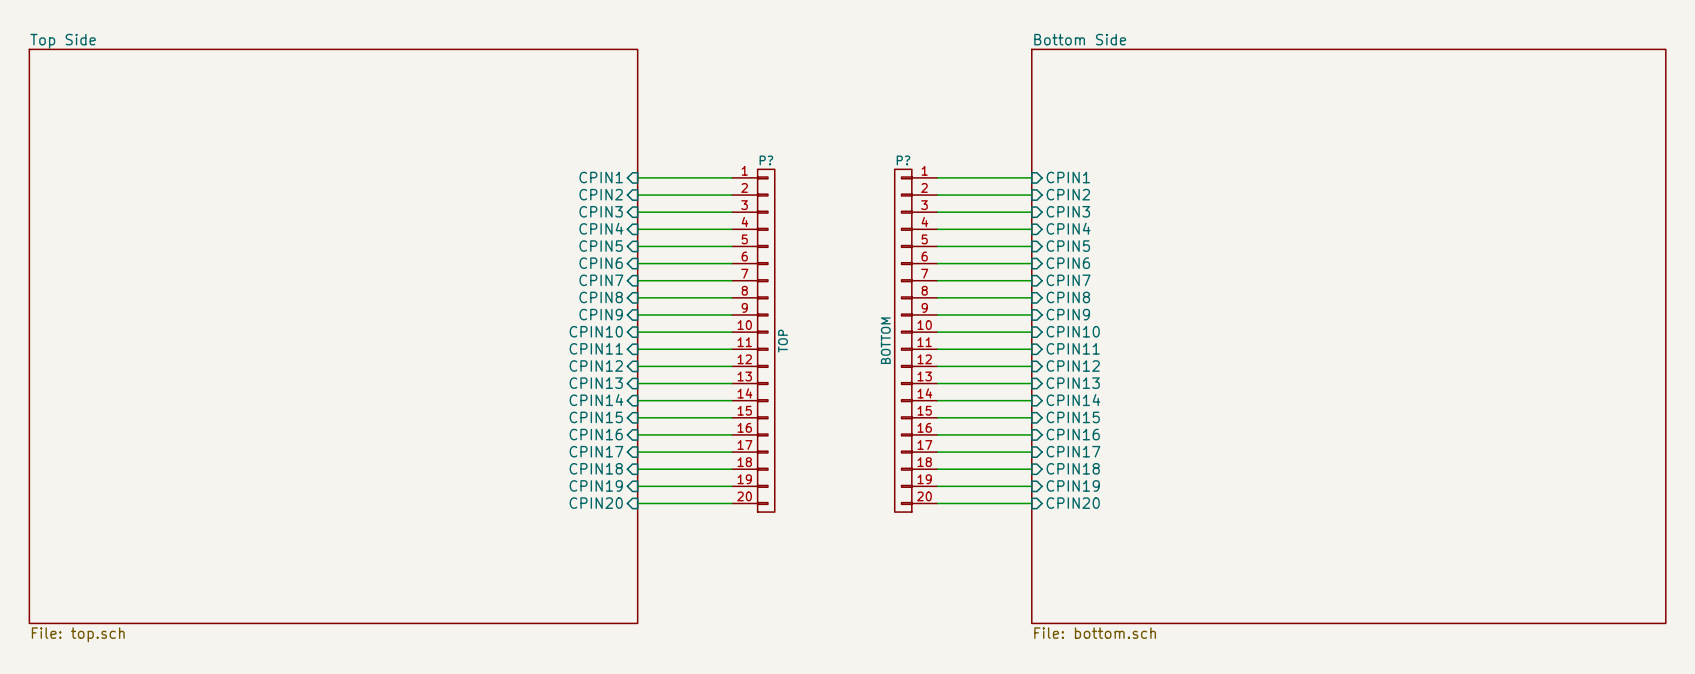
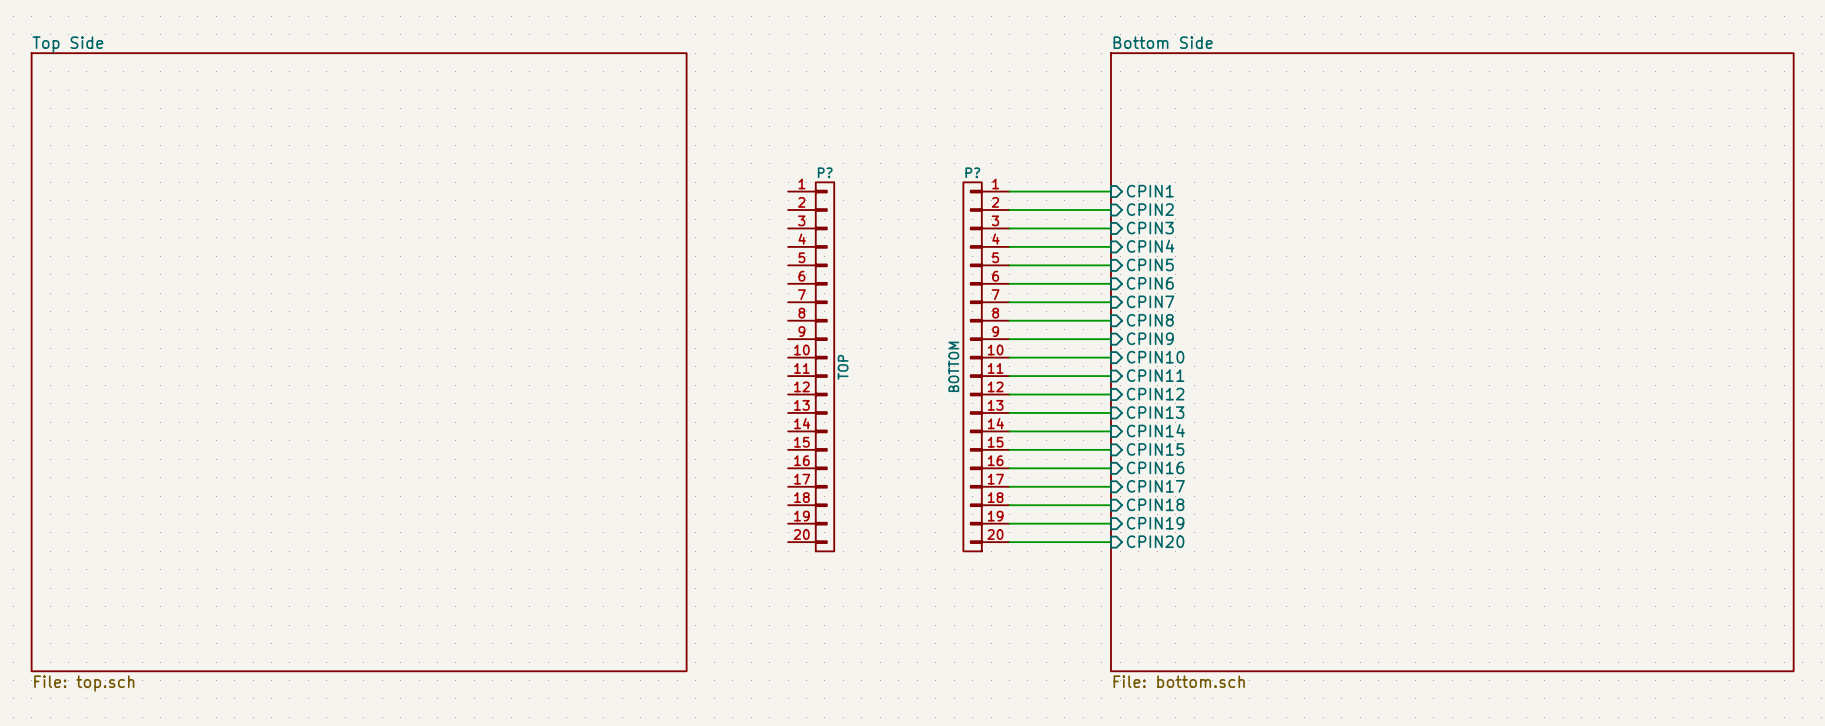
sheet pin: CPIN1 (601, 177) -> none
wire: (637, 177) (731, 177) -> none
sheet pin: CPIN2 (601, 194) -> none
wire: (637, 195) (731, 195) -> none
sheet pin: CPIN3 (601, 211) -> none
wire: (637, 212) (731, 212) -> none
sheet pin: CPIN4 (601, 228) -> none
wire: (637, 229) (731, 229) -> none
sheet pin: CPIN5 (601, 246) -> none
wire: (637, 246) (731, 246) -> none
sheet pin: CPIN6 (601, 263) -> none
wire: (637, 263) (731, 263) -> none
sheet pin: CPIN7 (601, 280) -> none
wire: (637, 280) (731, 280) -> none
sheet pin: CPIN8 (601, 297) -> none
wire: (637, 297) (731, 297) -> none
sheet pin: CPIN9 (601, 314) -> none
wire: (637, 314) (731, 314) -> none
sheet pin: CPIN10 (596, 331) -> none
wire: (637, 332) (731, 332) -> none
sheet pin: CPIN11 (596, 348) -> none
wire: (637, 349) (731, 349) -> none
sheet pin: CPIN12 (596, 366) -> none
wire: (637, 366) (731, 366) -> none
sheet pin: CPIN13 (596, 383) -> none
wire: (637, 383) (731, 383) -> none
sheet pin: CPIN14 (596, 400) -> none
wire: (637, 400) (731, 400) -> none
sheet pin: CPIN15 (596, 417) -> none
wire: (637, 417) (731, 417) -> none
sheet pin: CPIN16 (596, 434) -> none
wire: (637, 434) (731, 434) -> none
sheet pin: CPIN17 (596, 451) -> none
wire: (637, 452) (731, 452) -> none
sheet pin: CPIN18 (596, 468) -> none
wire: (637, 469) (731, 469) -> none
sheet pin: CPIN19 (596, 485) -> none
wire: (637, 486) (731, 486) -> none
sheet pin: CPIN20 (596, 503) -> none
wire: (637, 503) (731, 503) -> none

